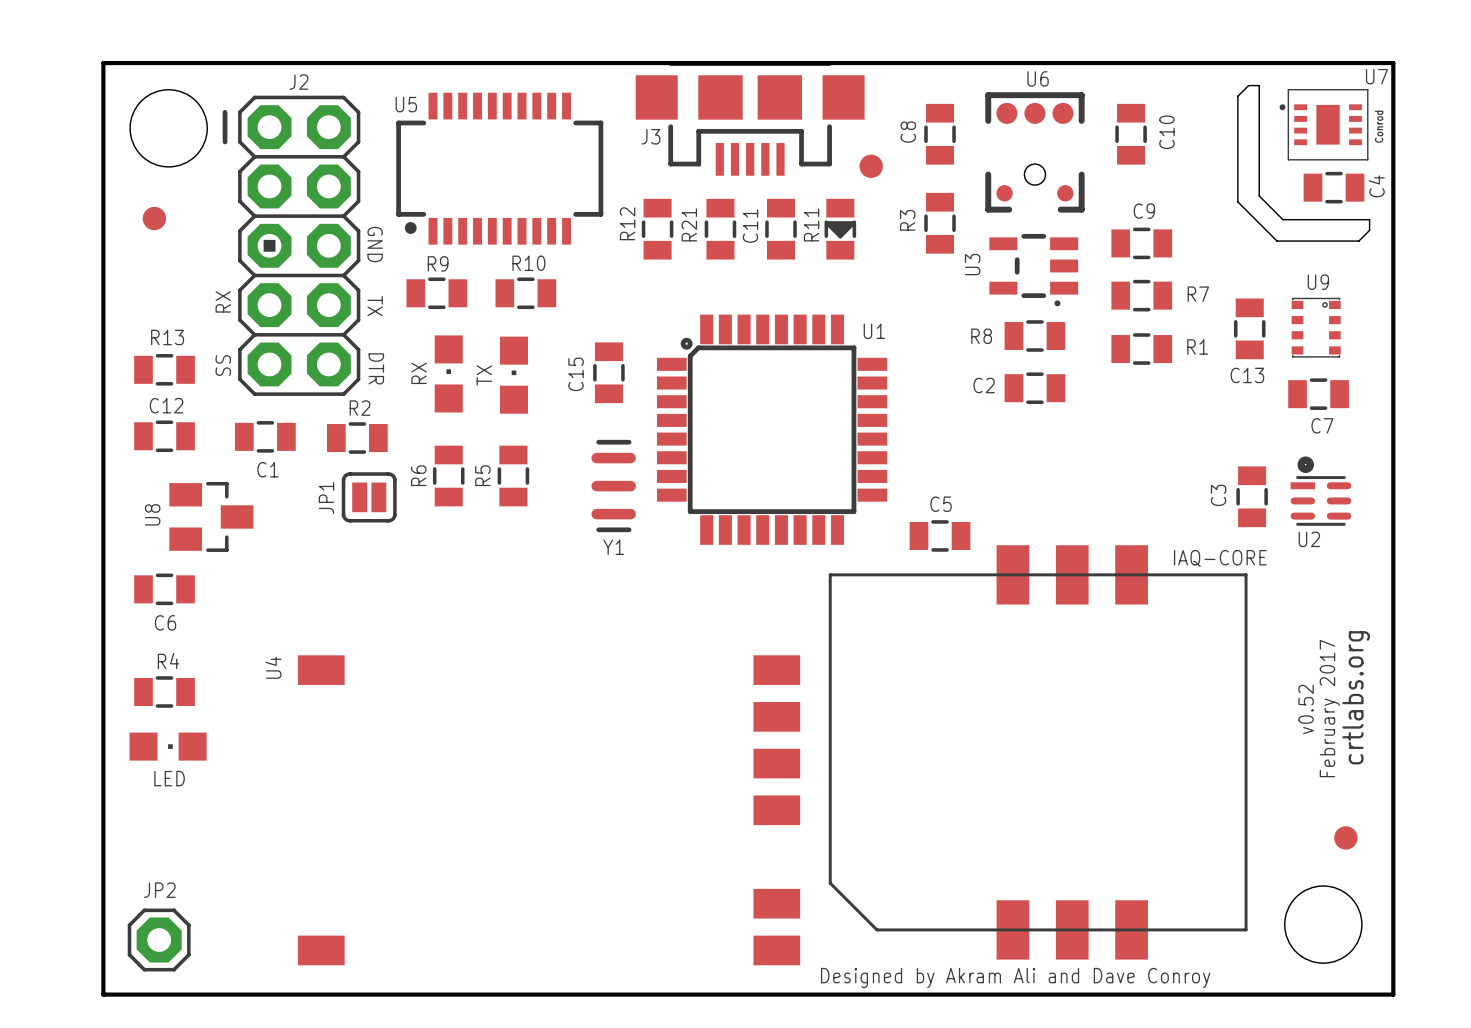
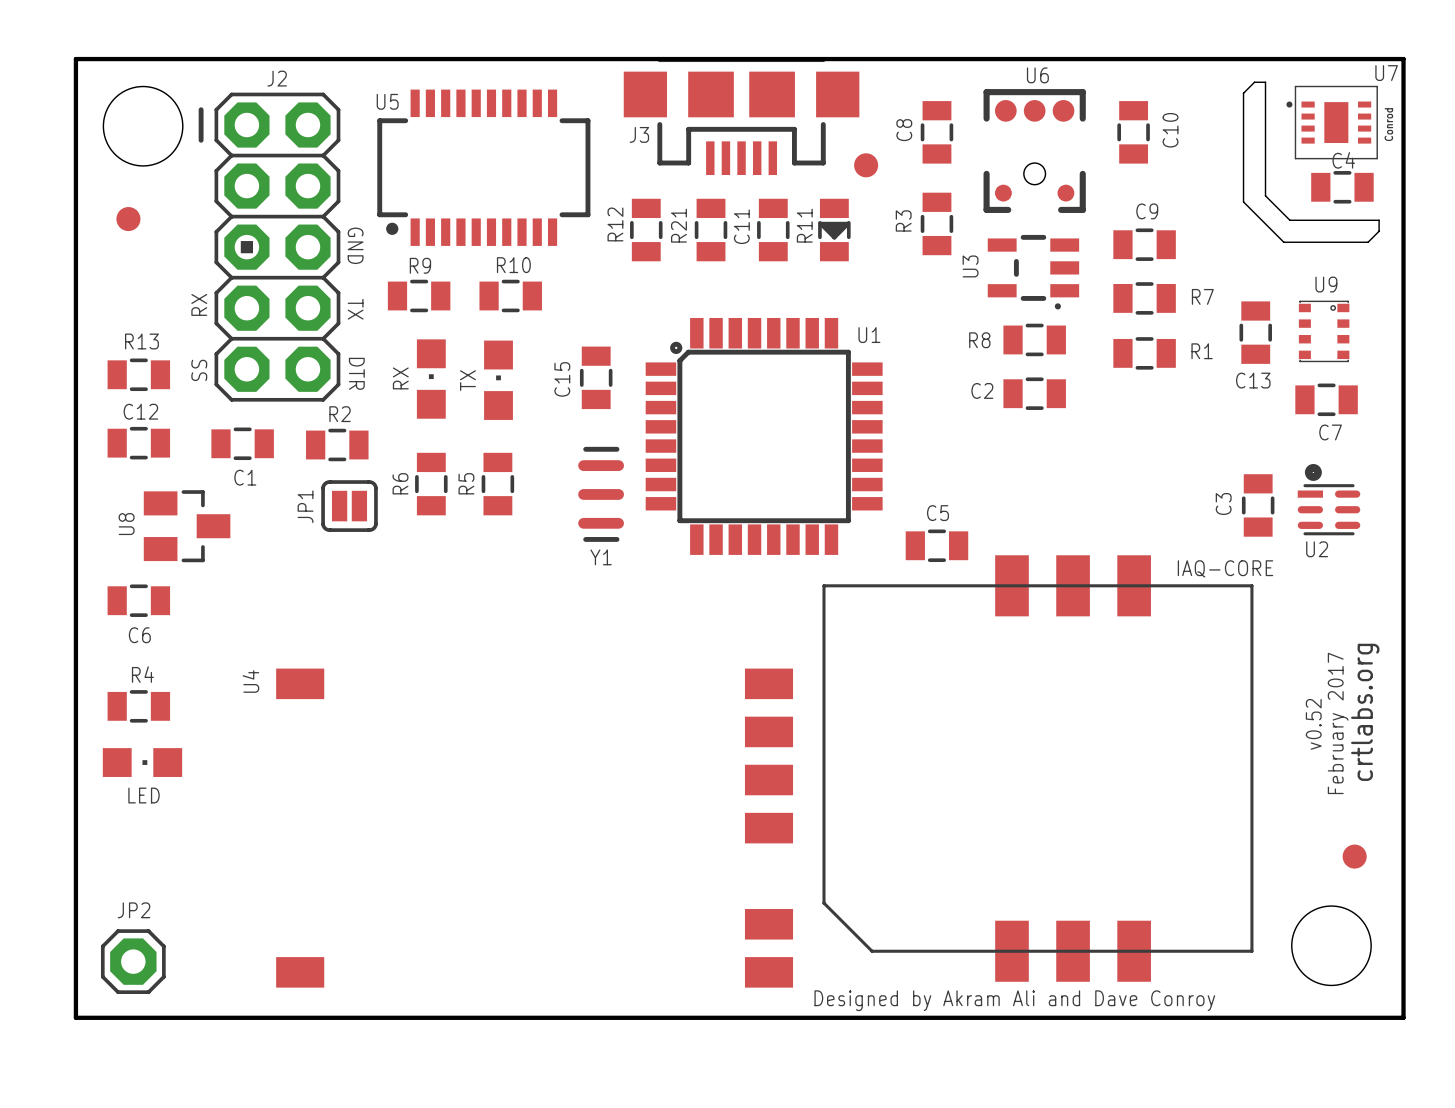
C4 name rotation: 0° (1376, 186) -> 90° clockwise (1343, 160)
C4 name position: C4 (1376, 186) -> C4 (1343, 160)

